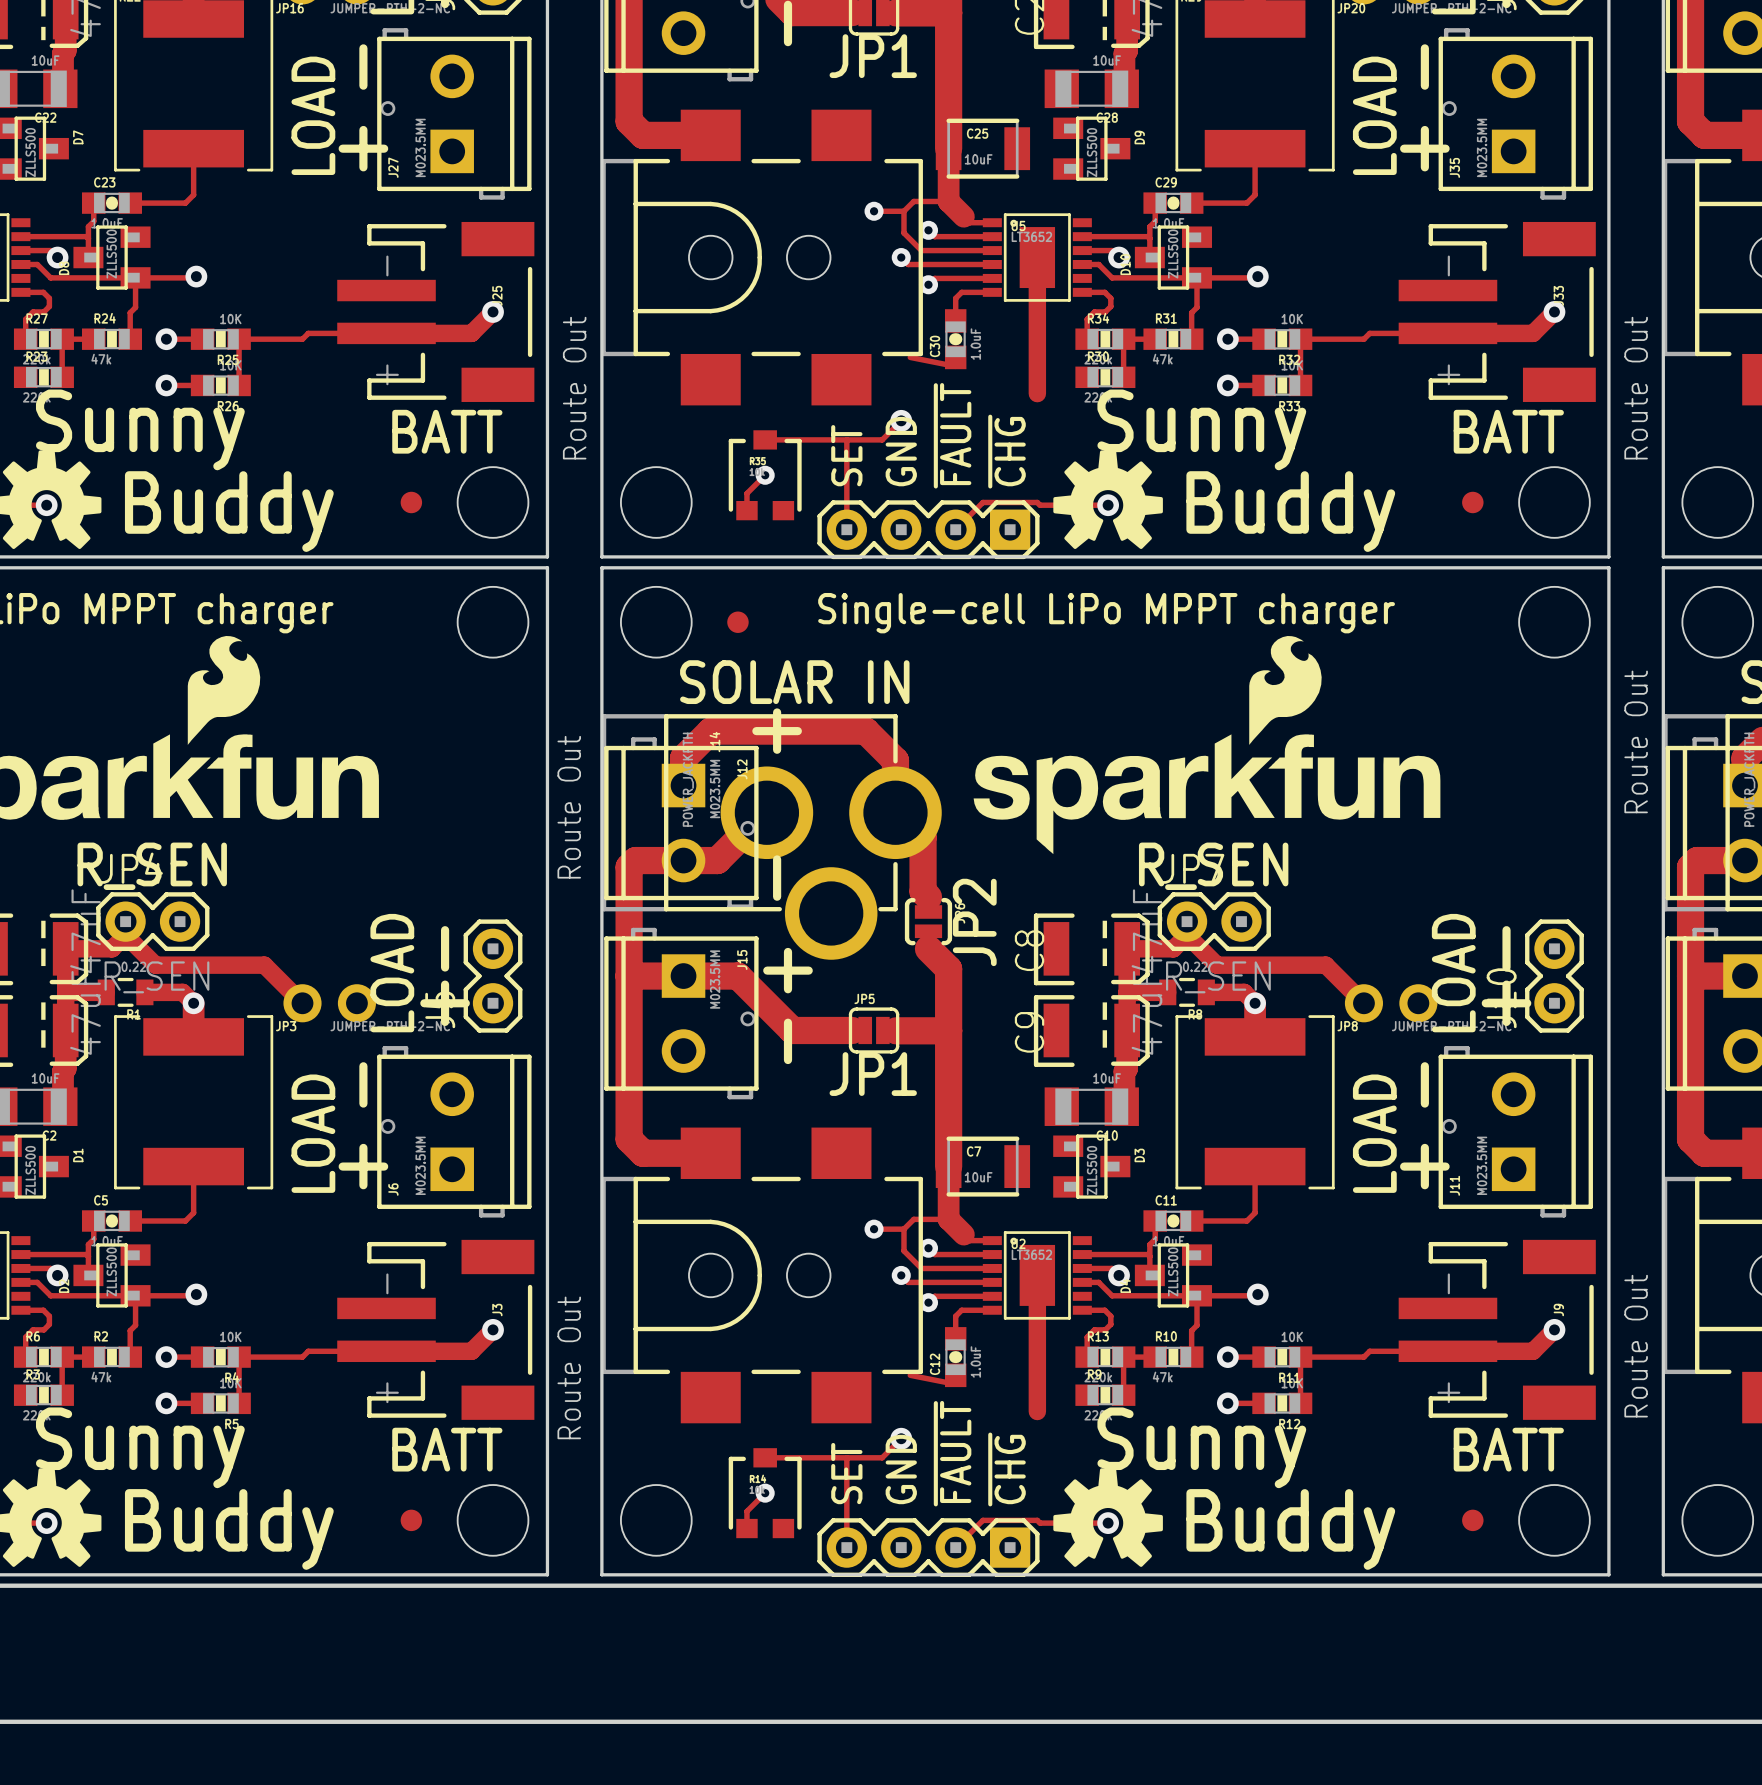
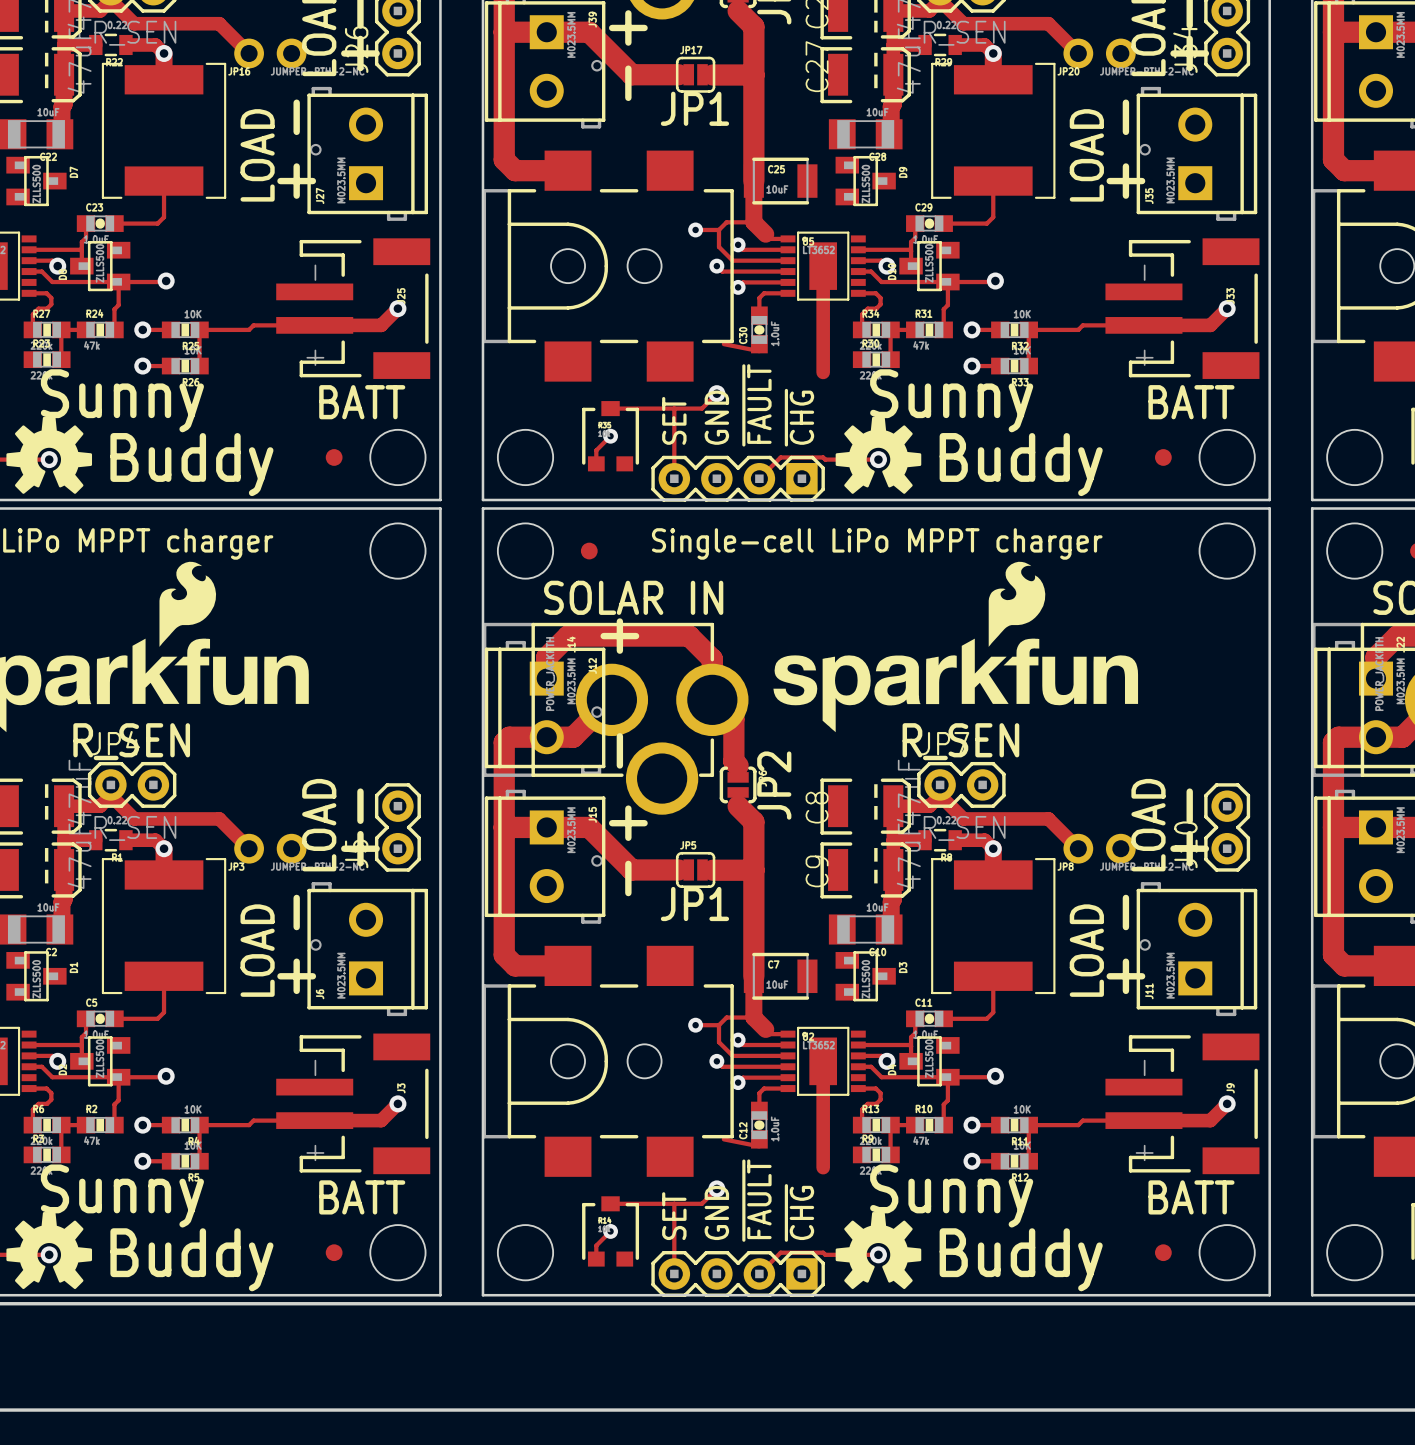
text: Route Out (574, 388) -> none
text: Route Out (1636, 388) -> none
text: Route Out (1636, 741) -> none
text: Route Out (569, 807) -> none
text: Route Out (1636, 1346) -> none
text: Route Out (569, 1367) -> none

